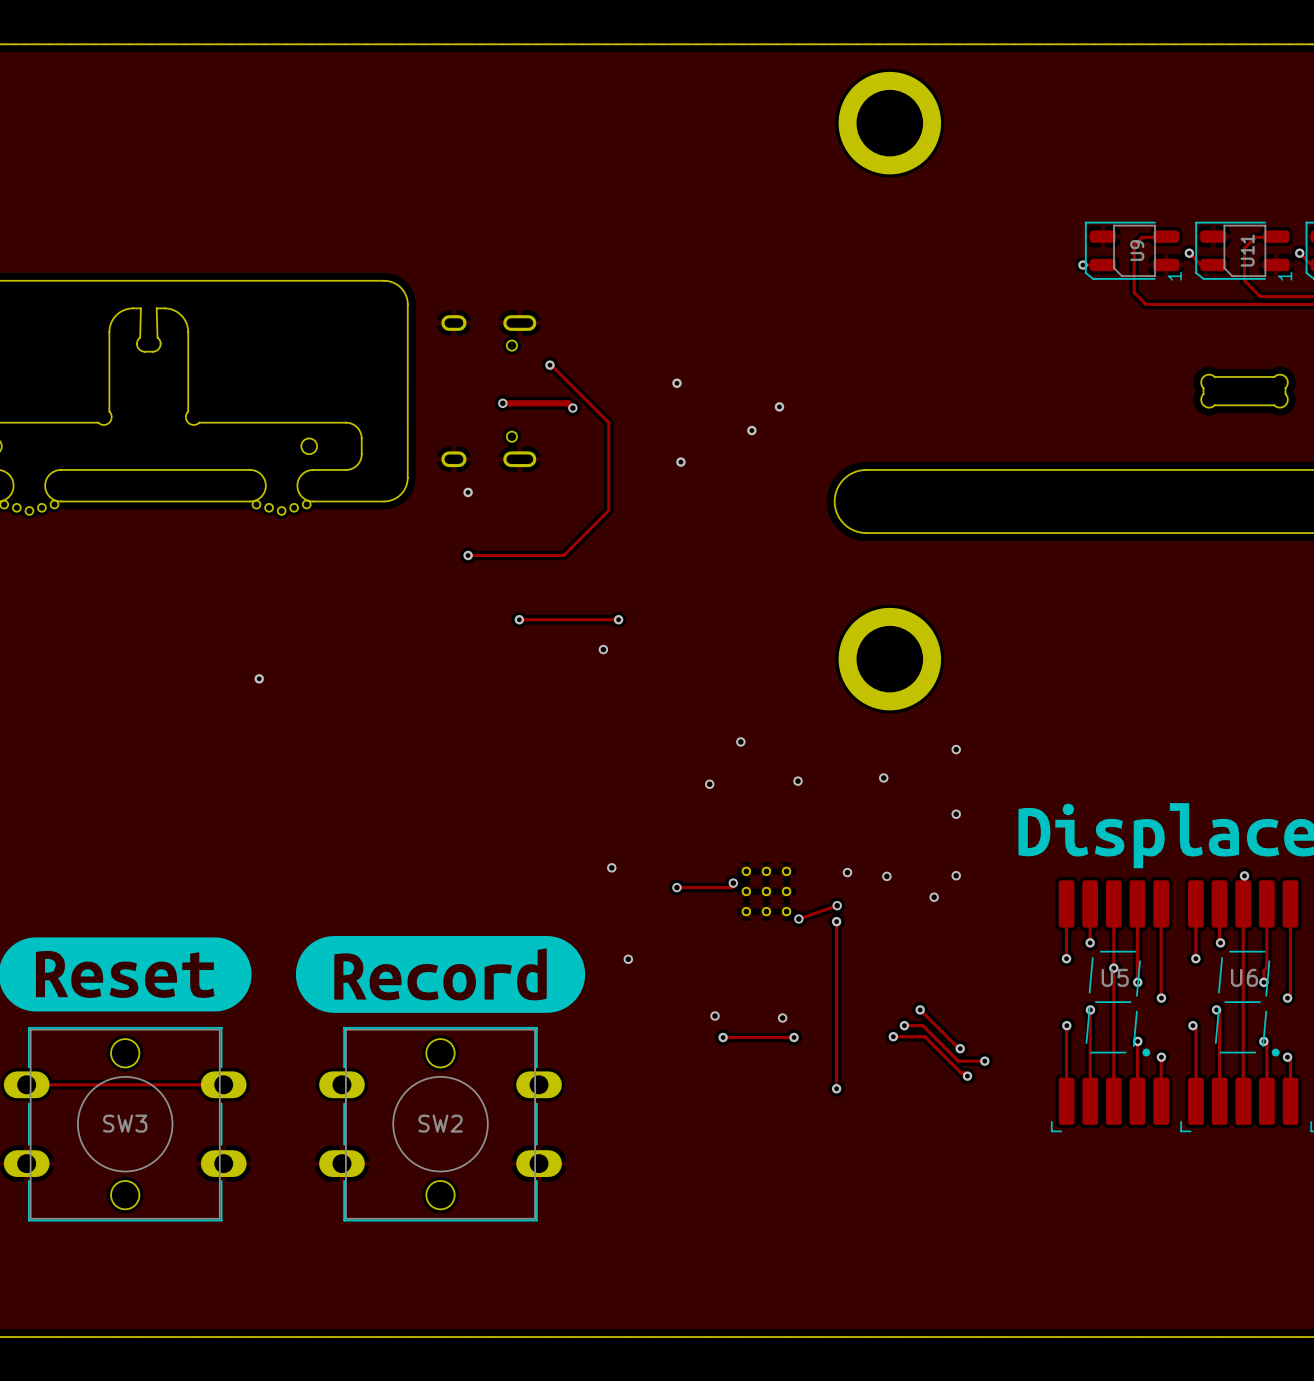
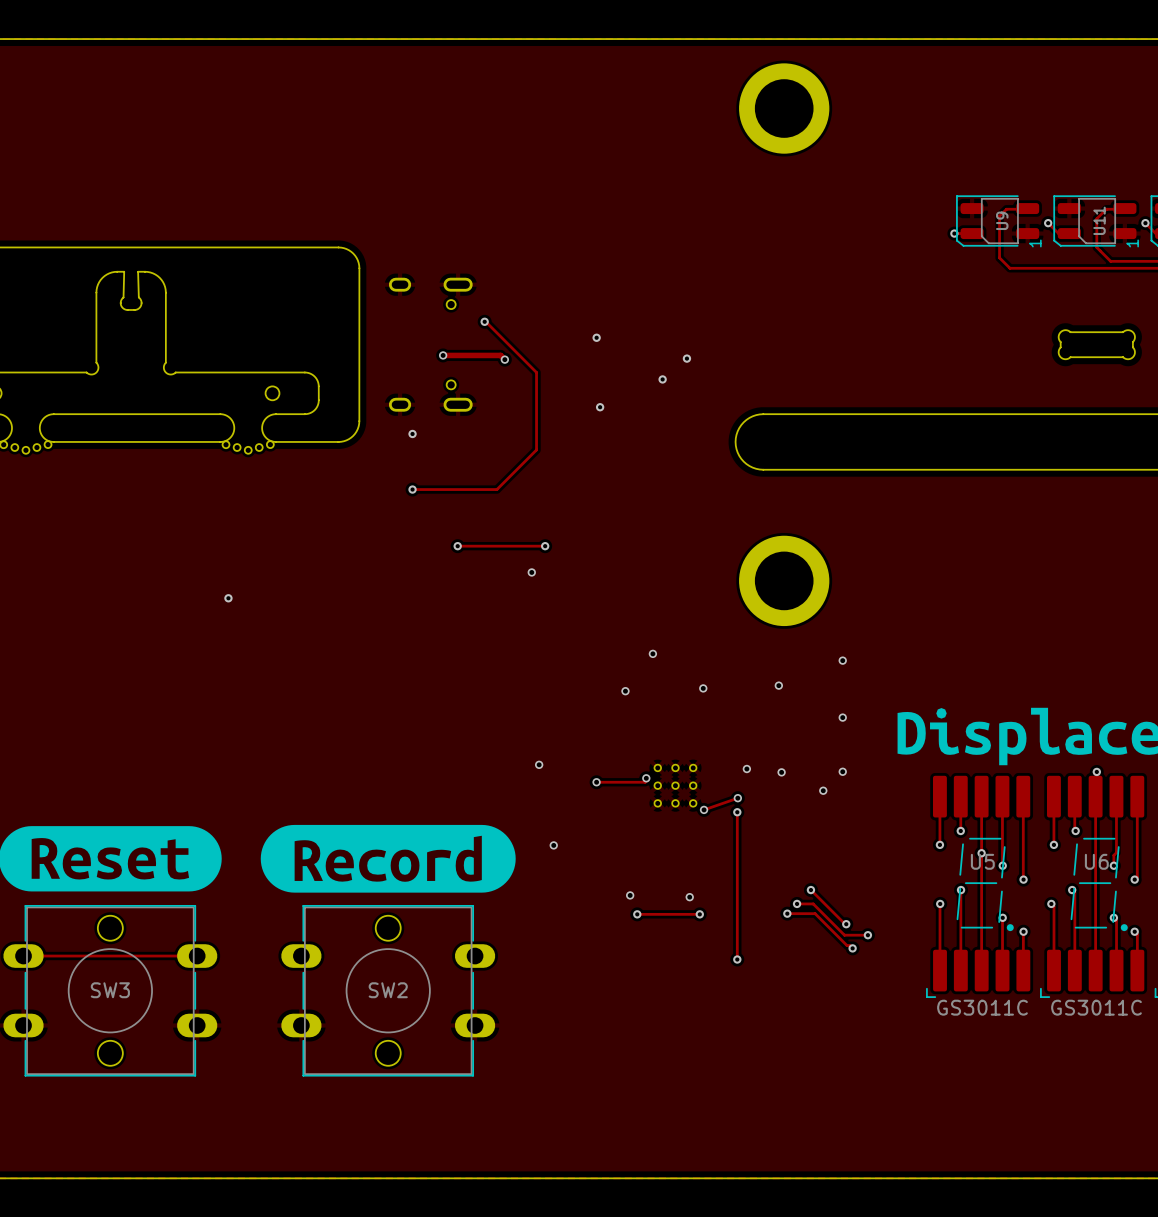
U5 value: none -> GS3011C (982, 1007)
U6 value: none -> GS3011C (1096, 1007)

